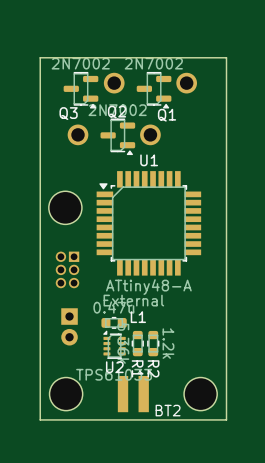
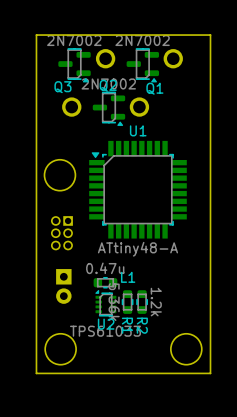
BT2: External (133, 394) -> none

